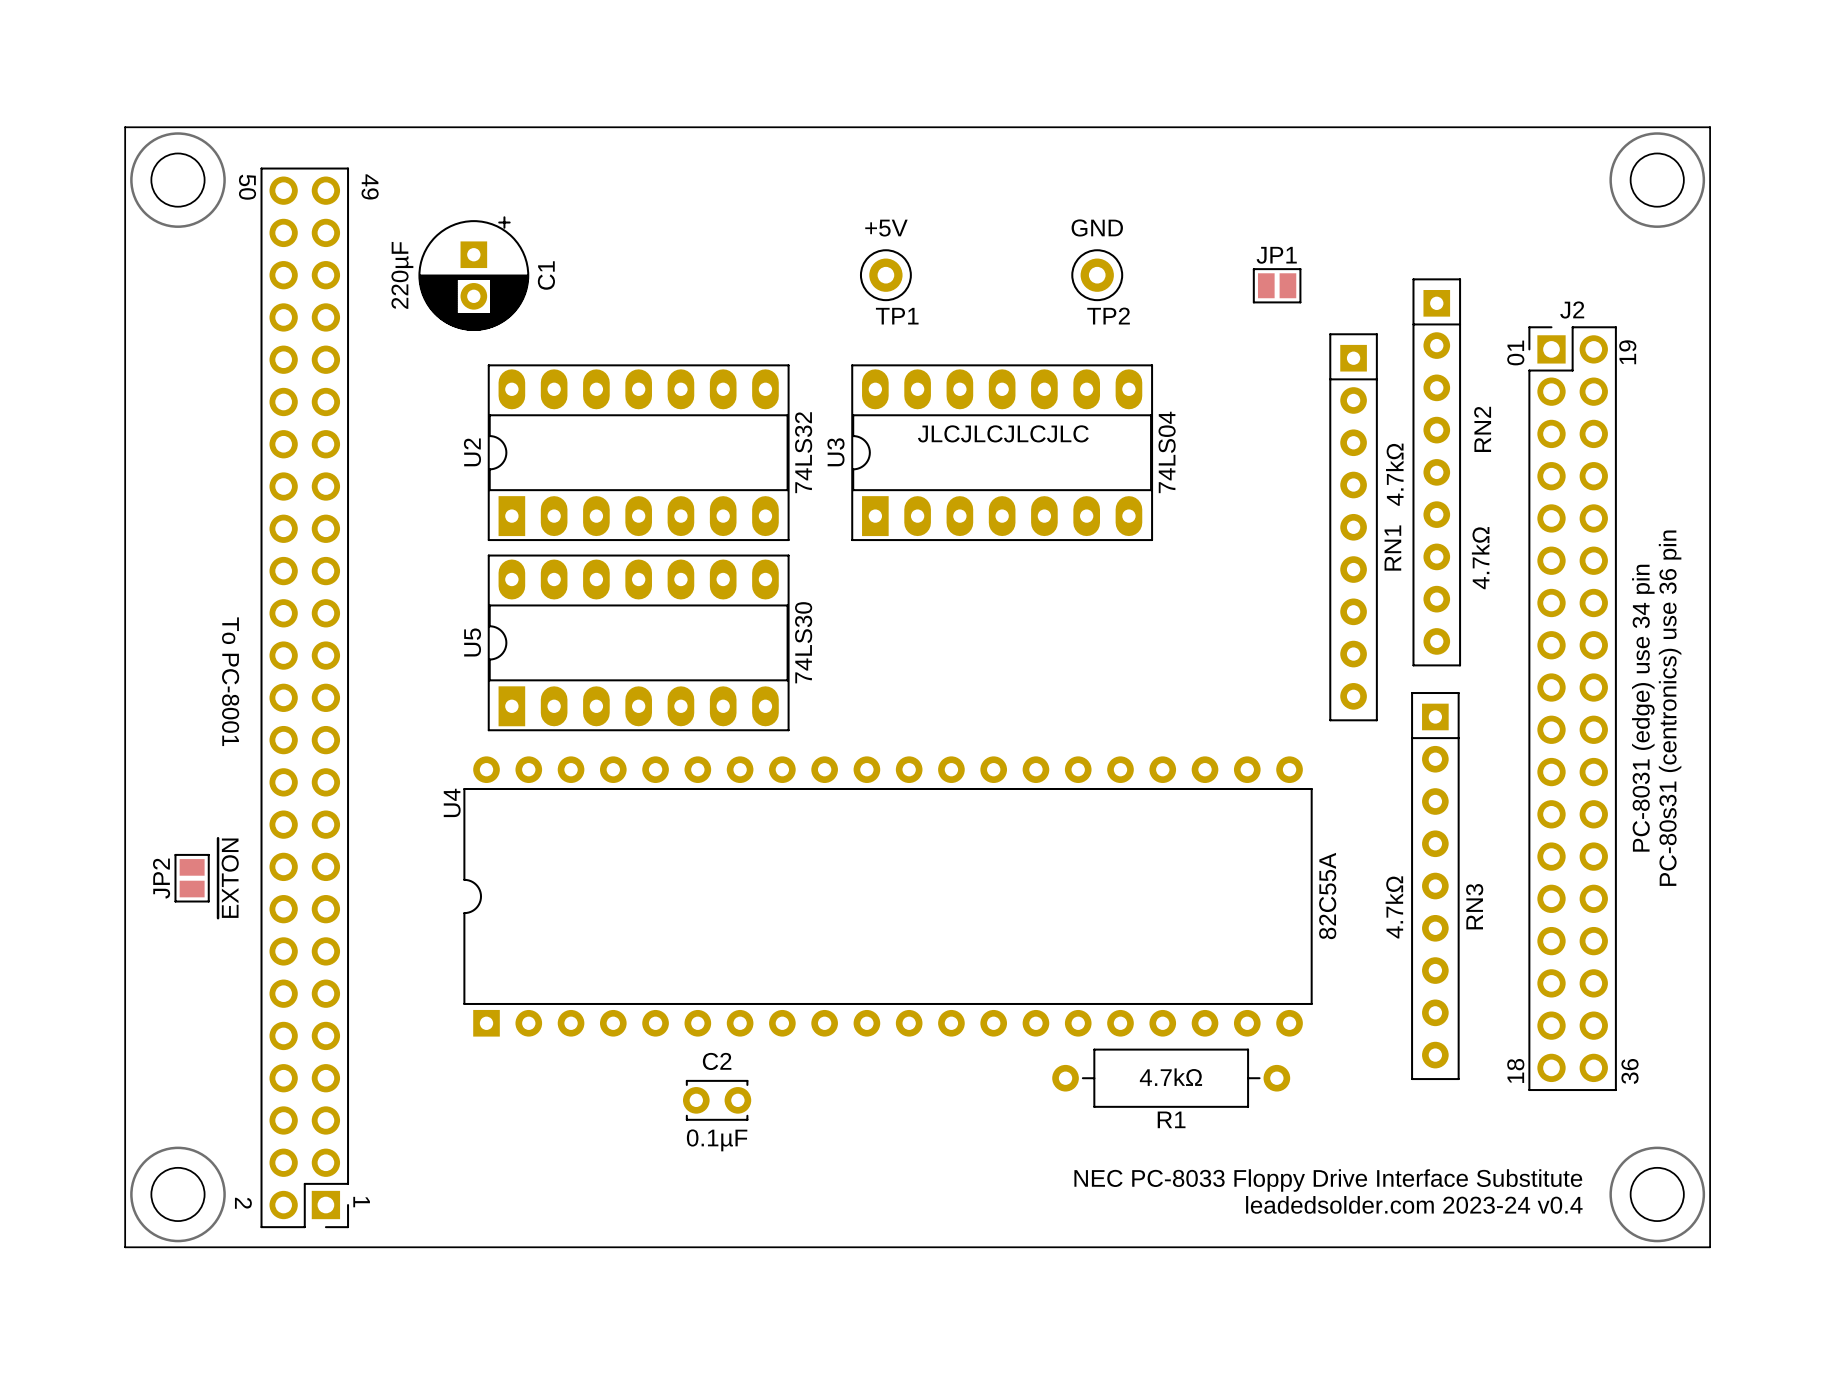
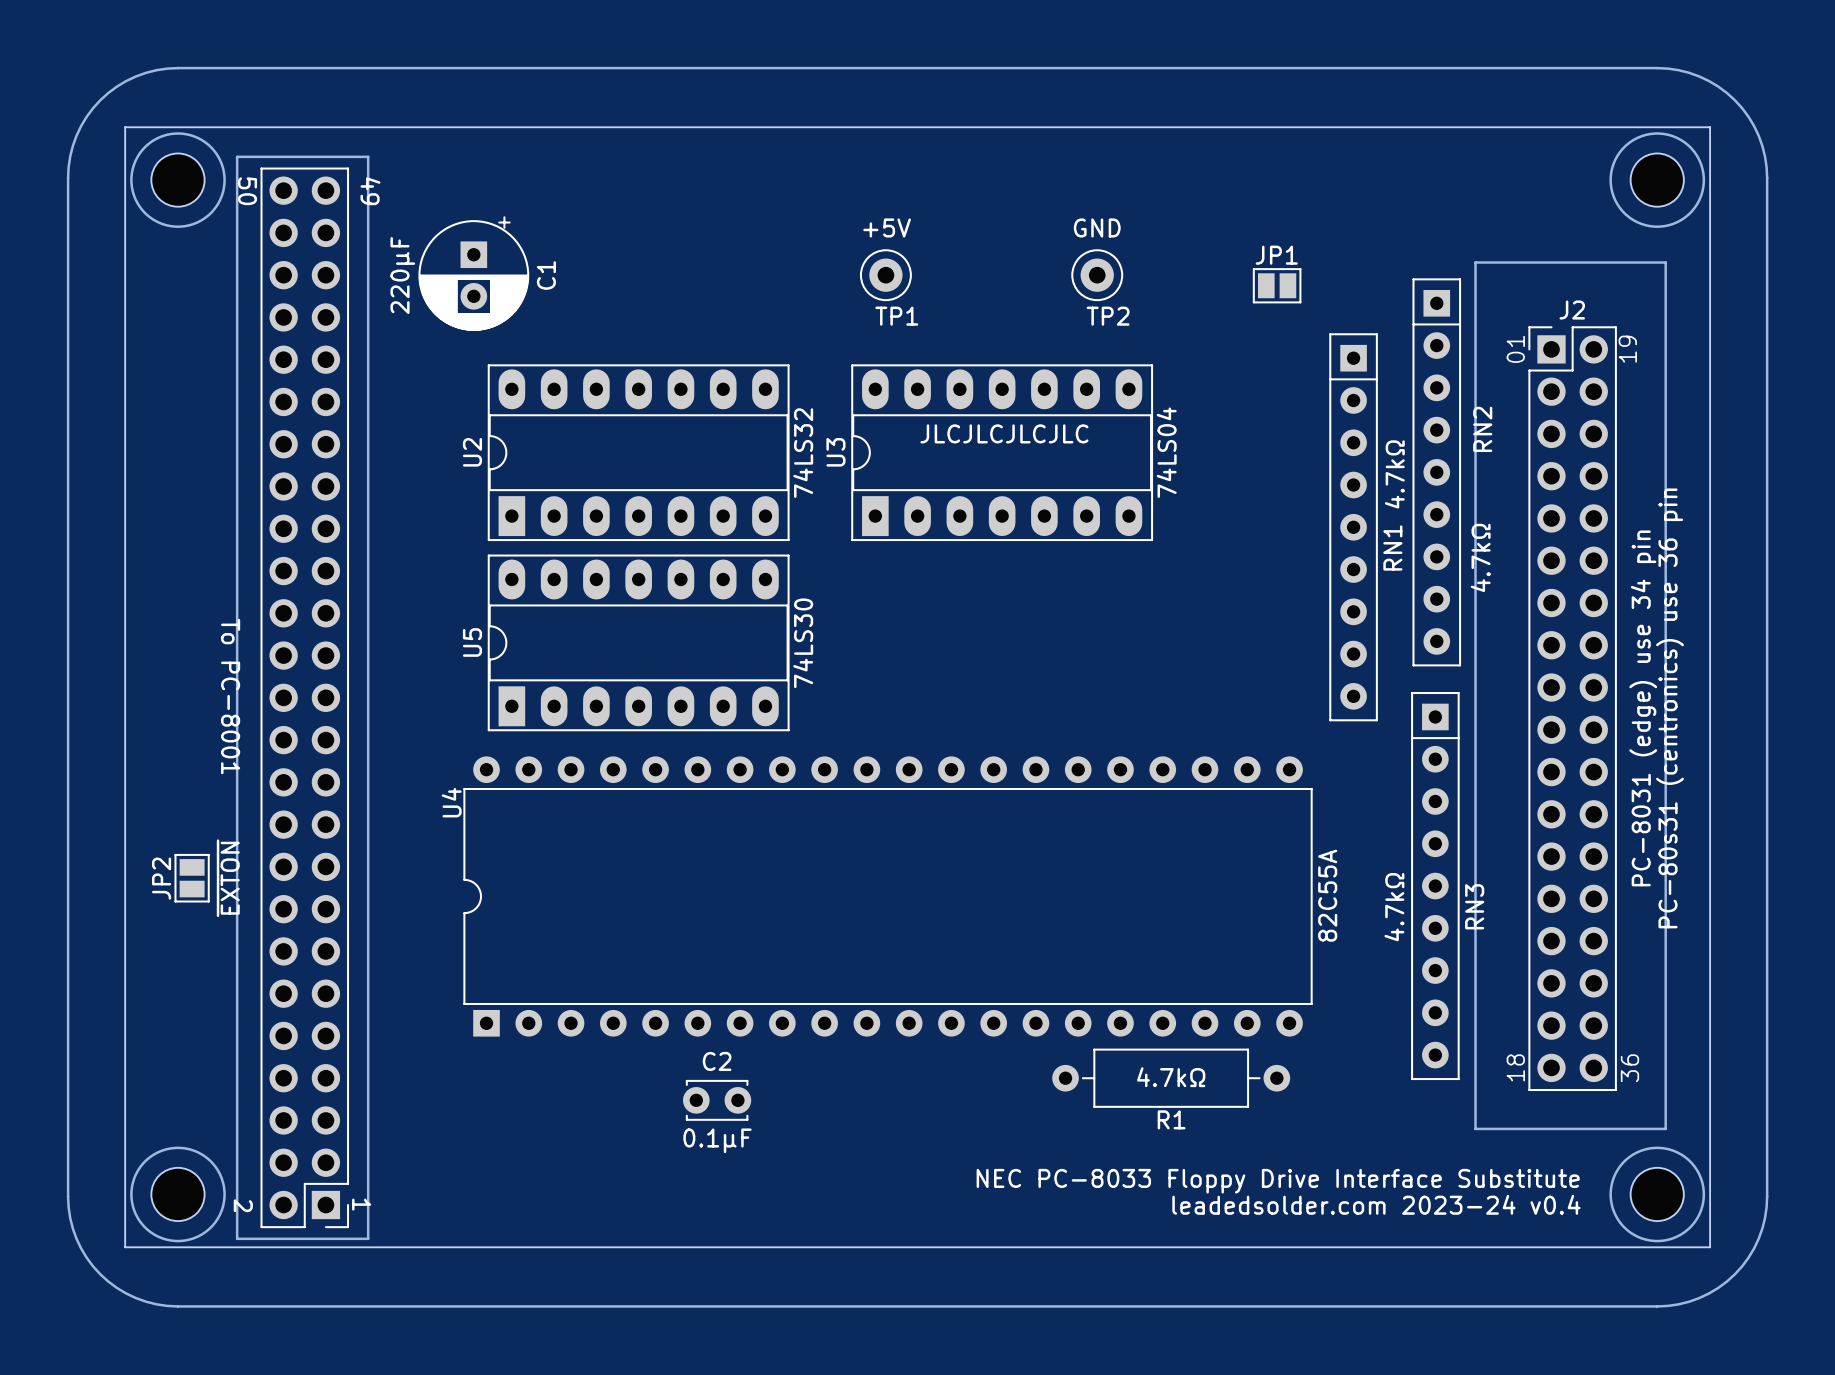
line: none -> (177, 68) (1657, 68) (1689, 72) (1709, 81) (1726, 93) (1748, 116) (1758, 135) (1765, 156) (1767, 177) (1767, 1196) (1762, 1228) (1754, 1248) (1742, 1266) (1726, 1281) (1699, 1298) (1678, 1304) (1657, 1306) (177, 1306) (156, 1304) (135, 1298) (108, 1281) (93, 1266) (81, 1248) (72, 1228) (68, 1196) (68, 167) (72, 146) (81, 126) (93, 108) (108, 93) (126, 81) (146, 72) (177, 68)
line: none -> (237, 156) (368, 156) (368, 1238) (237, 1238) (237, 156)
line: none -> (1475, 262) (1665, 262) (1665, 1128) (1475, 1128) (1475, 262)

